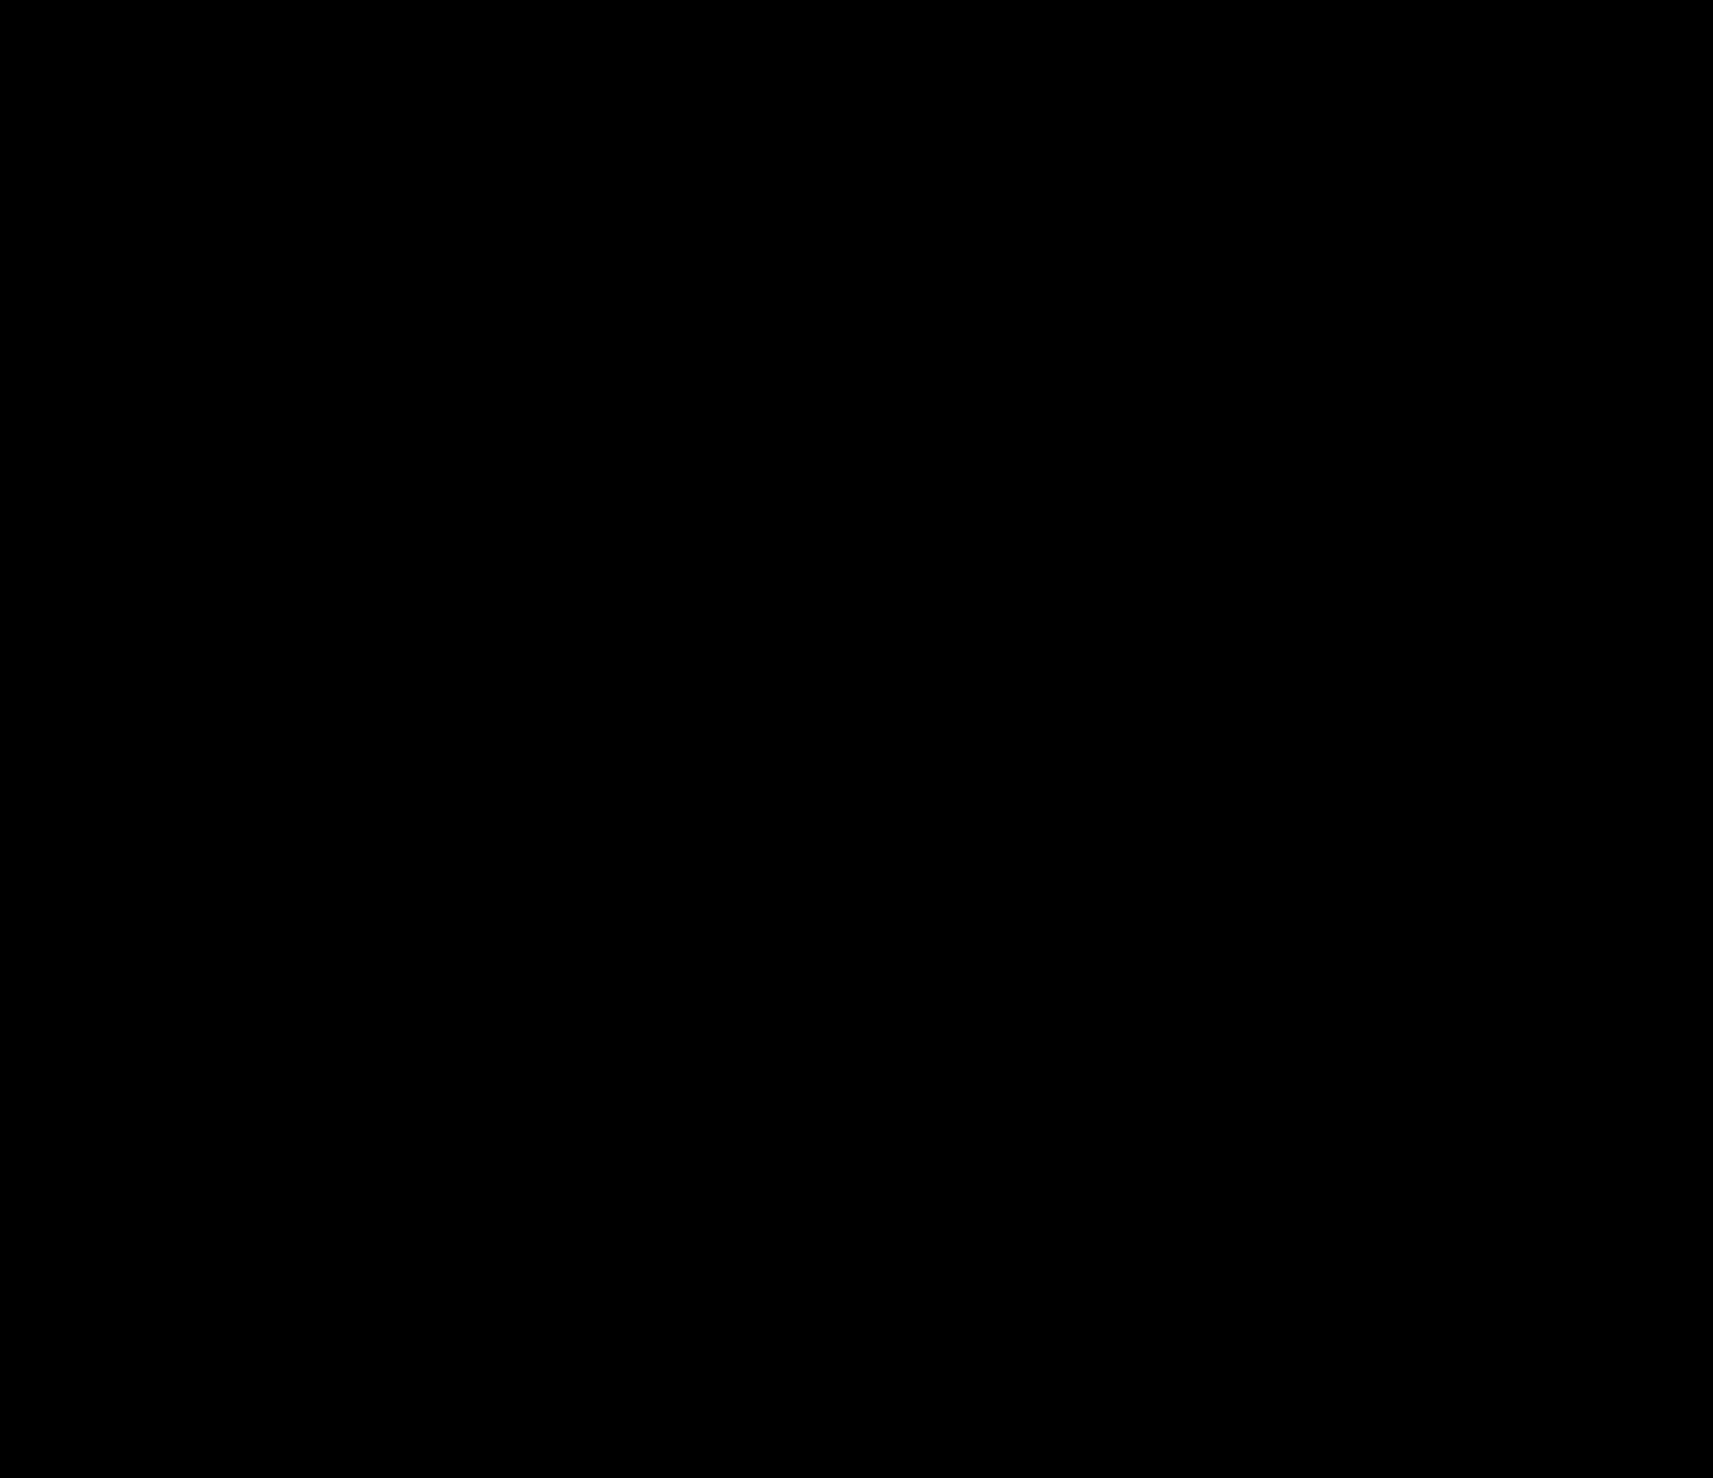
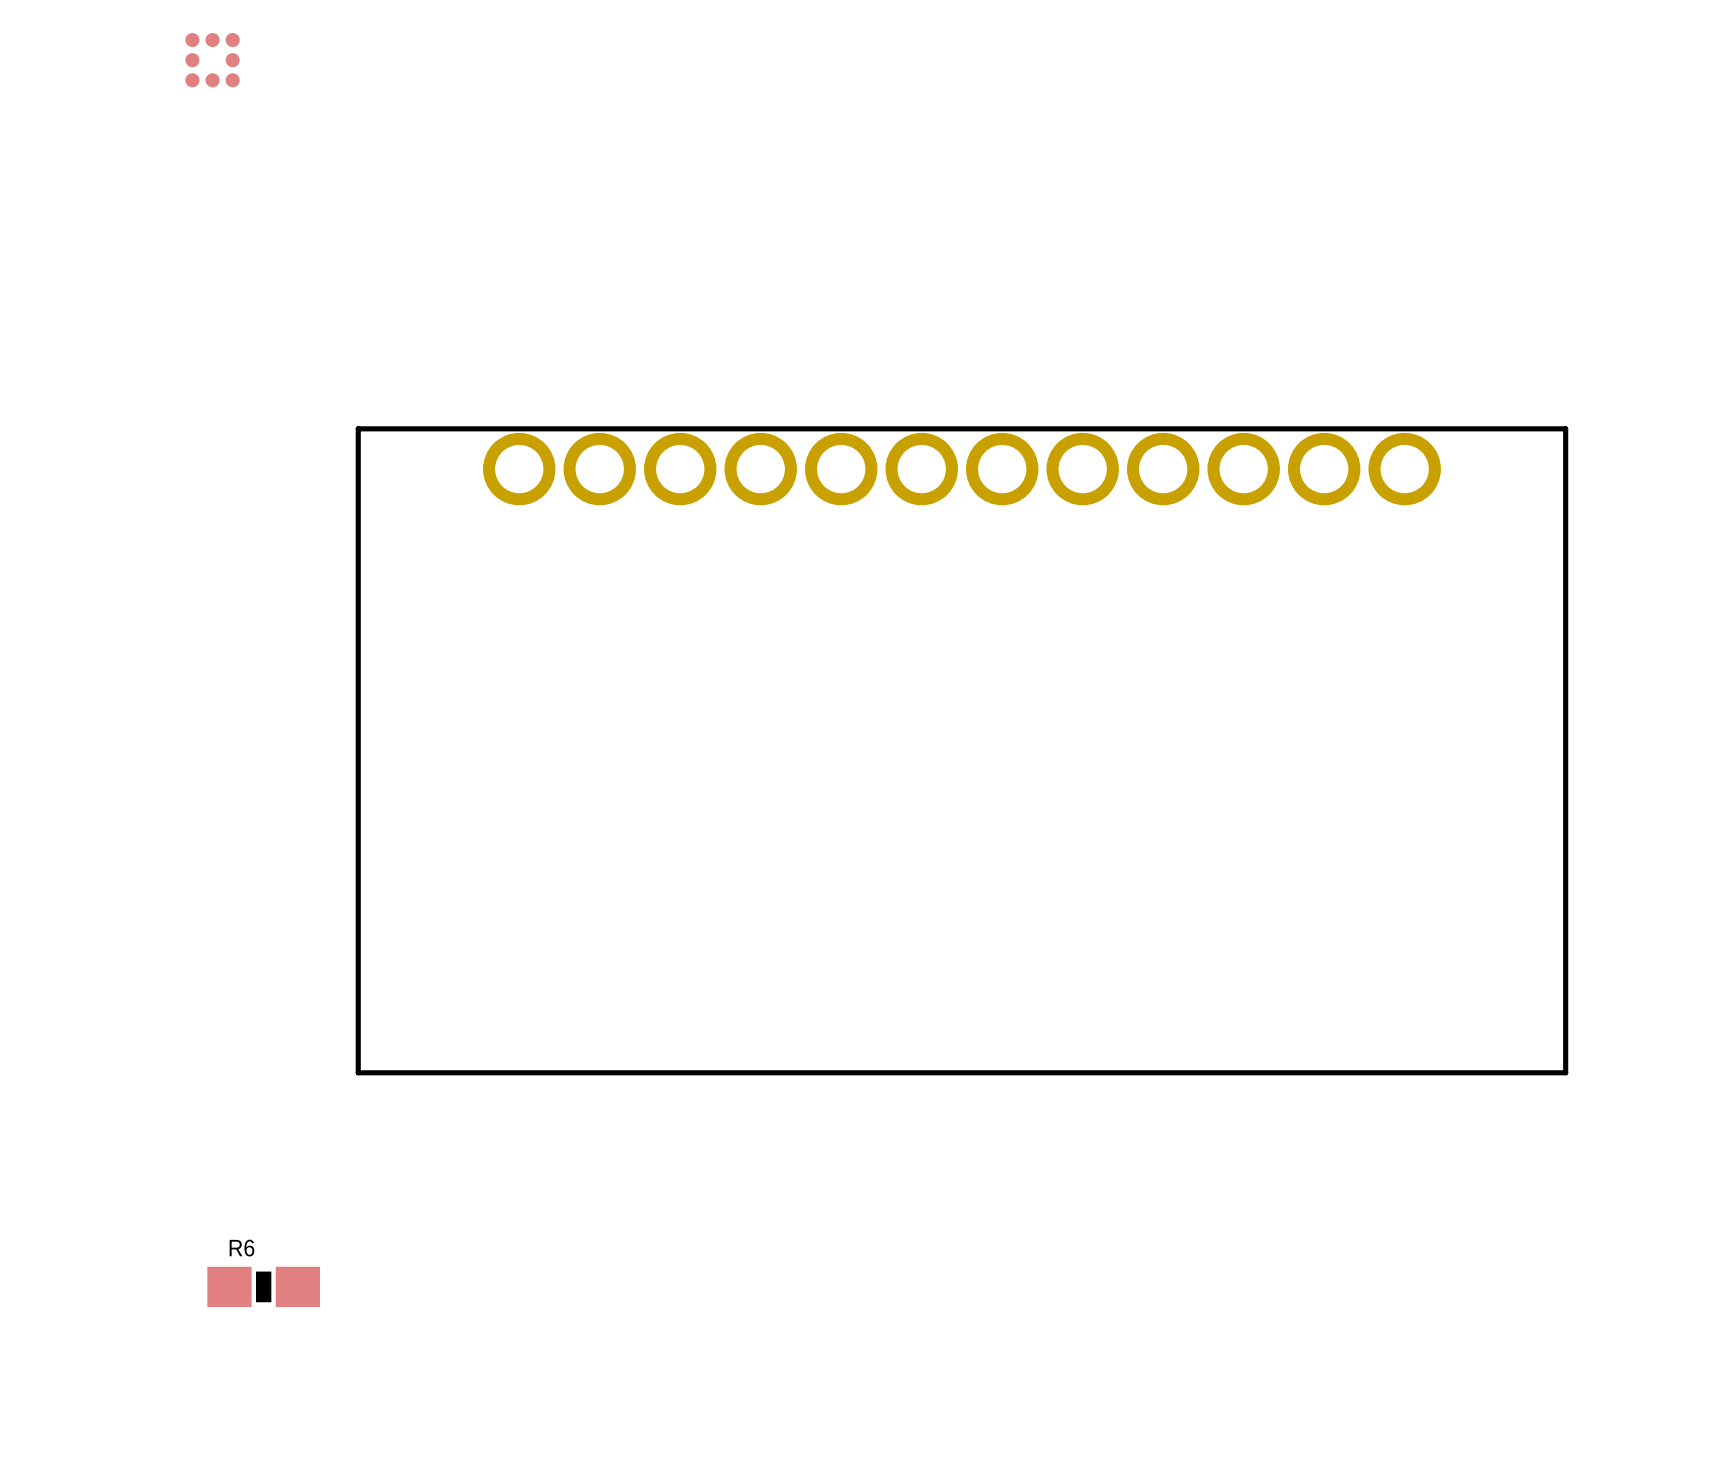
part: none -> (212, 60)
part: none -> (961, 750)
R6: none -> (263, 1286)

